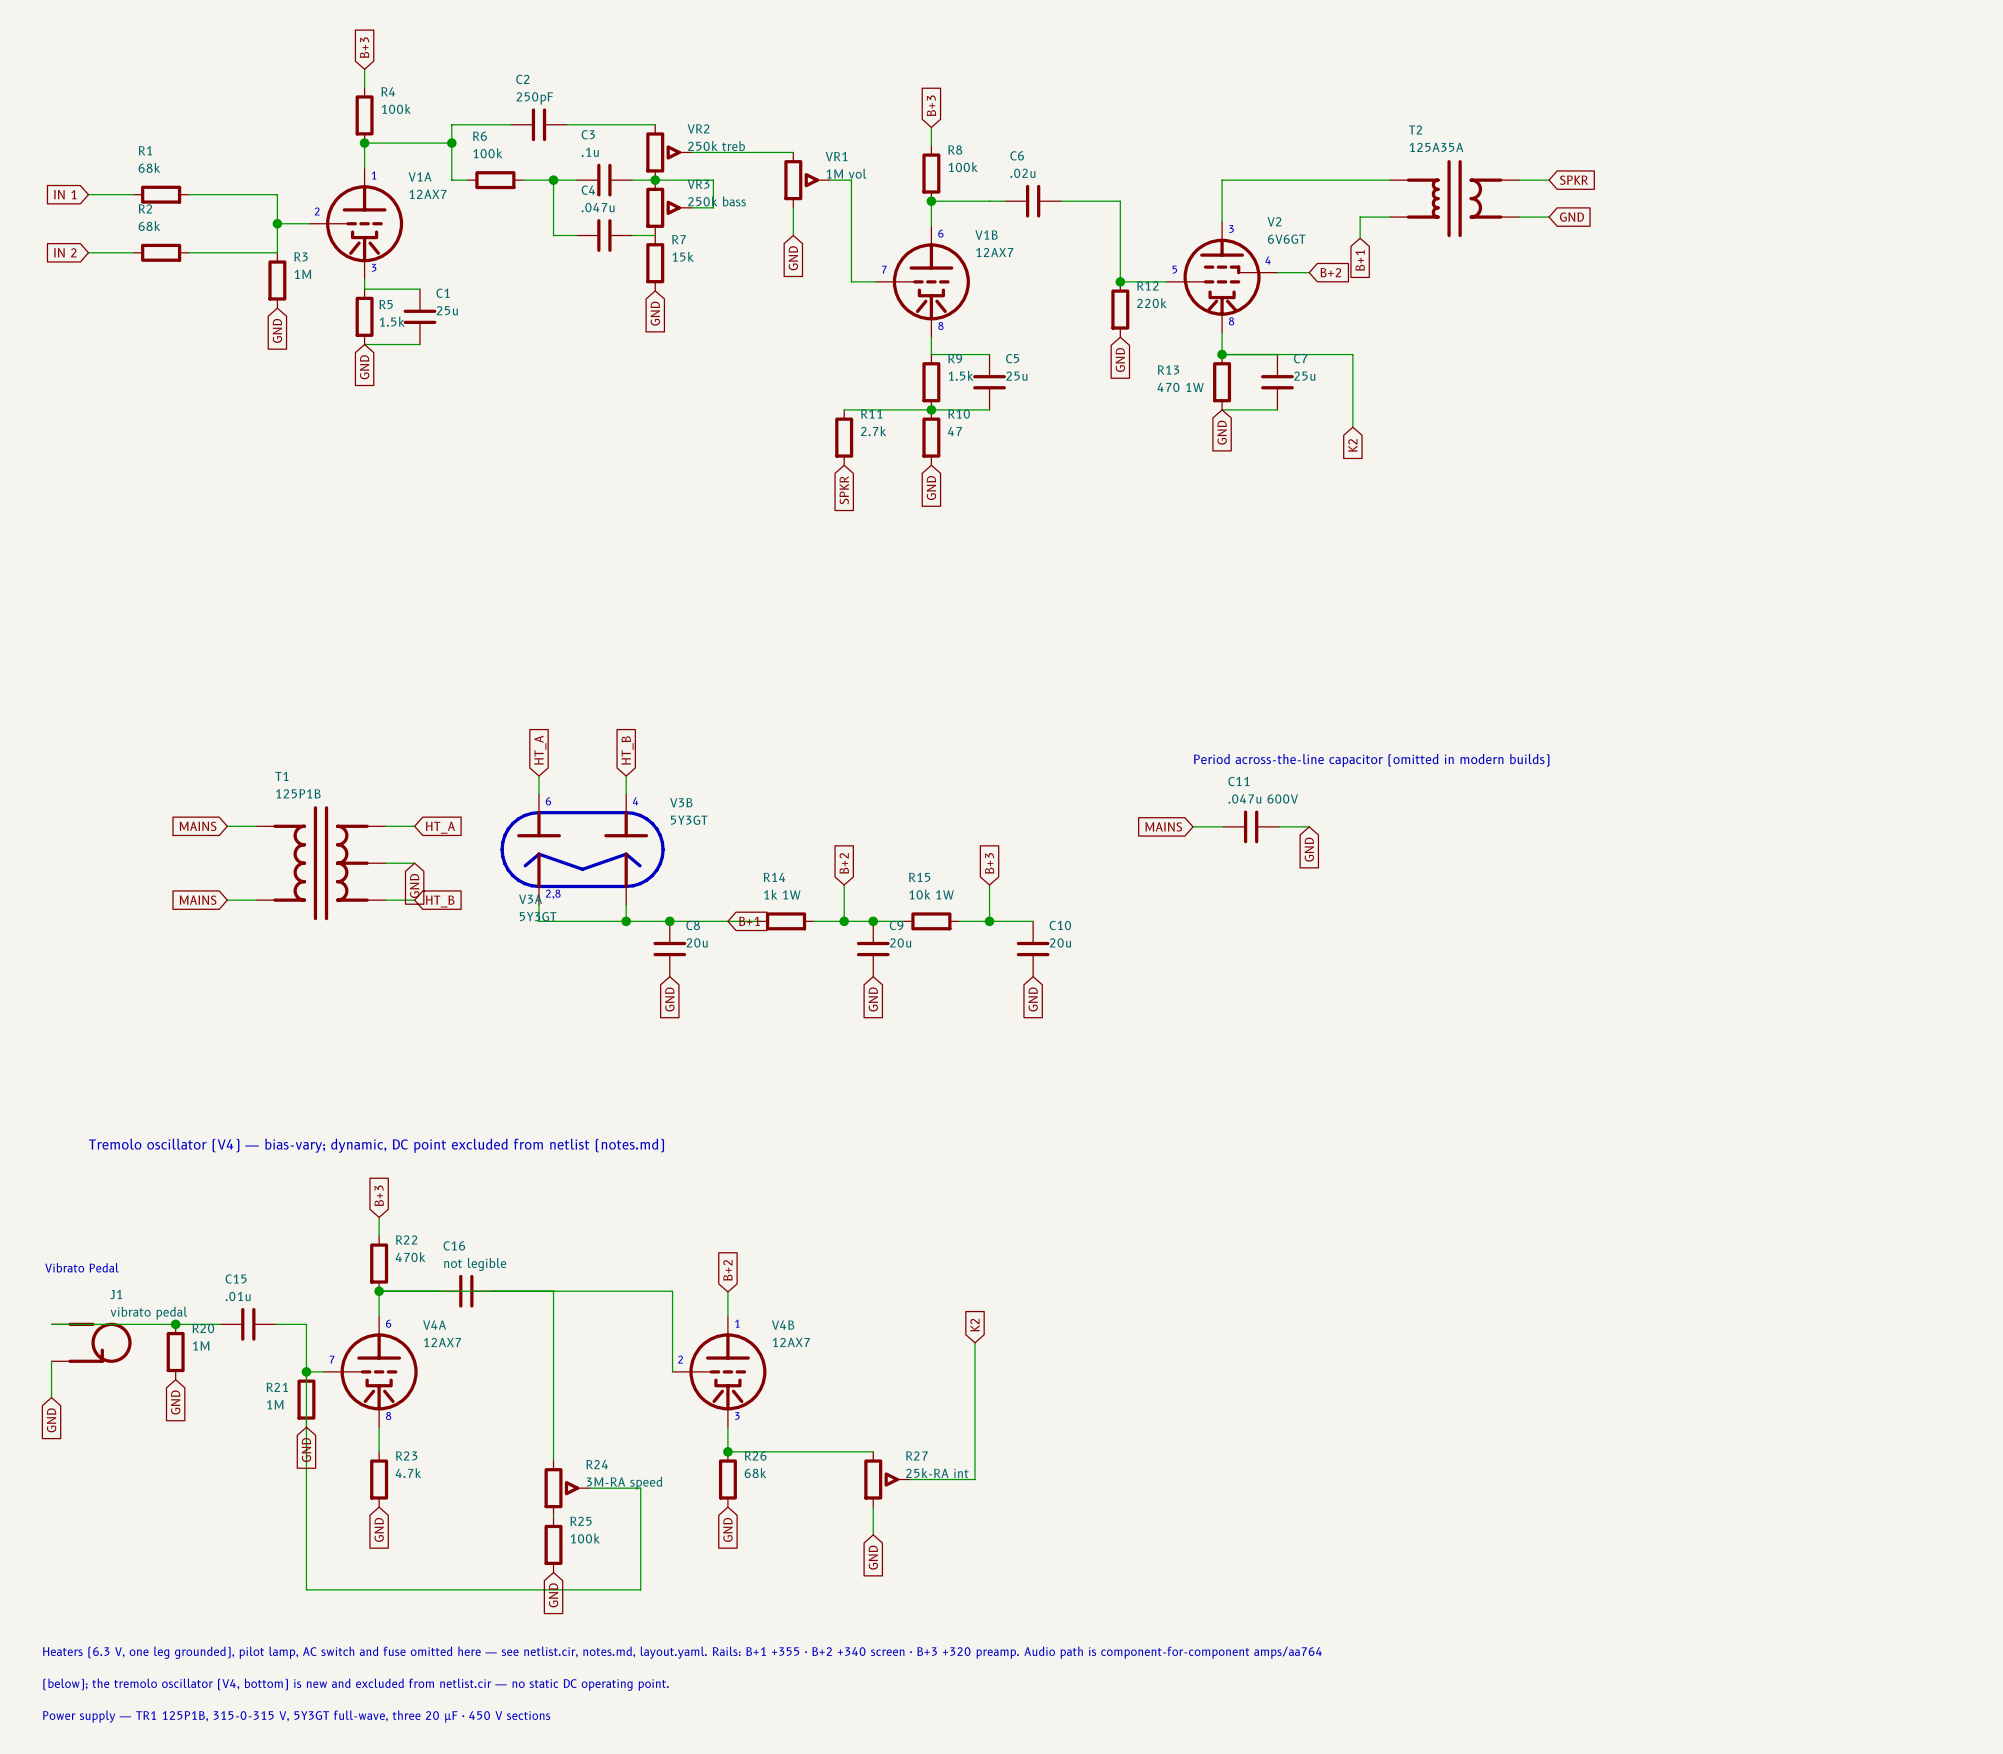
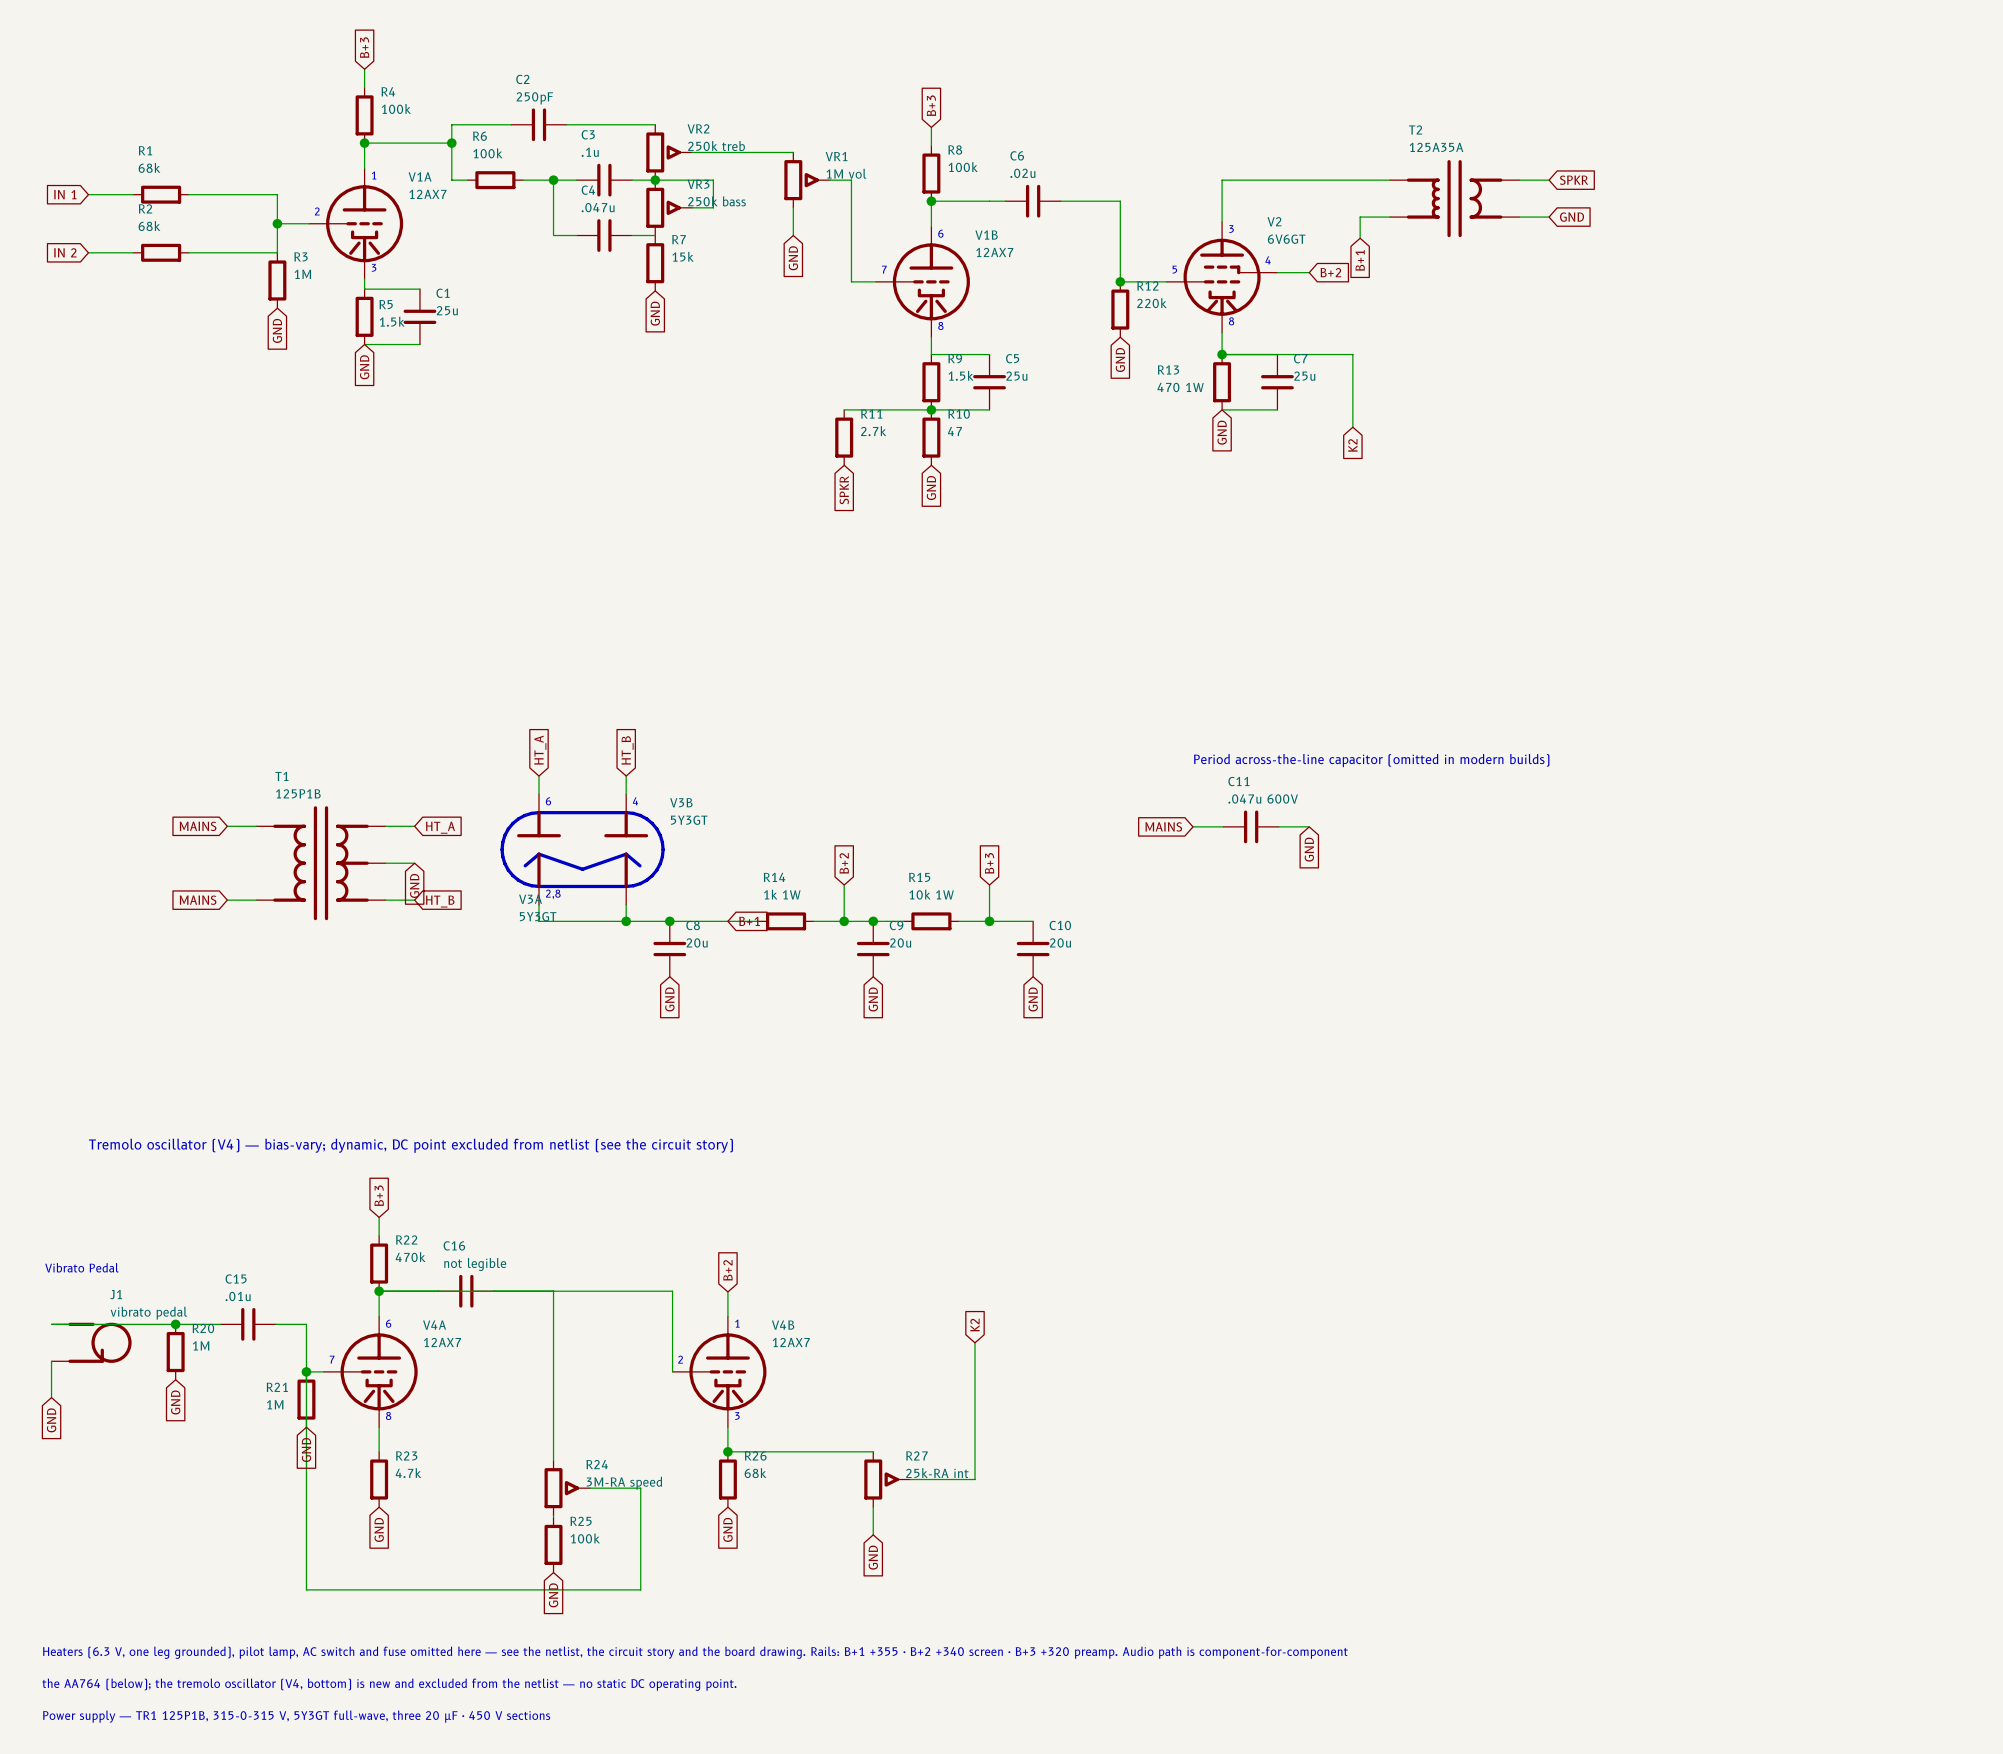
text: Tremolo oscillator (V4) — bias-vary; dynamic, DC point excluded from netlist (notes.md) (376, 1145) -> Tremolo oscillator (V4) — bias-vary; dynamic, DC point excluded from netlist (see the circuit story) (410, 1145)
text: Heaters (6.3 V, one leg grounded), pilot lamp, AC switch and fuse omitted here — see netlist.cir, notes.md, layout.yaml. Rails: B+1 +355 · B+2 +340 screen · B+3 +320 preamp. Audio path is component-for-component amps/aa764 (682, 1652) -> Heaters (6.3 V, one leg grounded), pilot lamp, AC switch and fuse omitted here — see the netlist, the circuit story and the board drawing. Rails: B+1 +355 · B+2 +340 screen · B+3 +320 preamp. Audio path is component-for-component (695, 1652)
text: (below); the tremolo oscillator (V4, bottom) is new and excluded from netlist.cir — no static DC operating point. (356, 1684) -> the AA764 (below); the tremolo oscillator (V4, bottom) is new and excluded from the netlist — no static DC operating point. (389, 1684)

